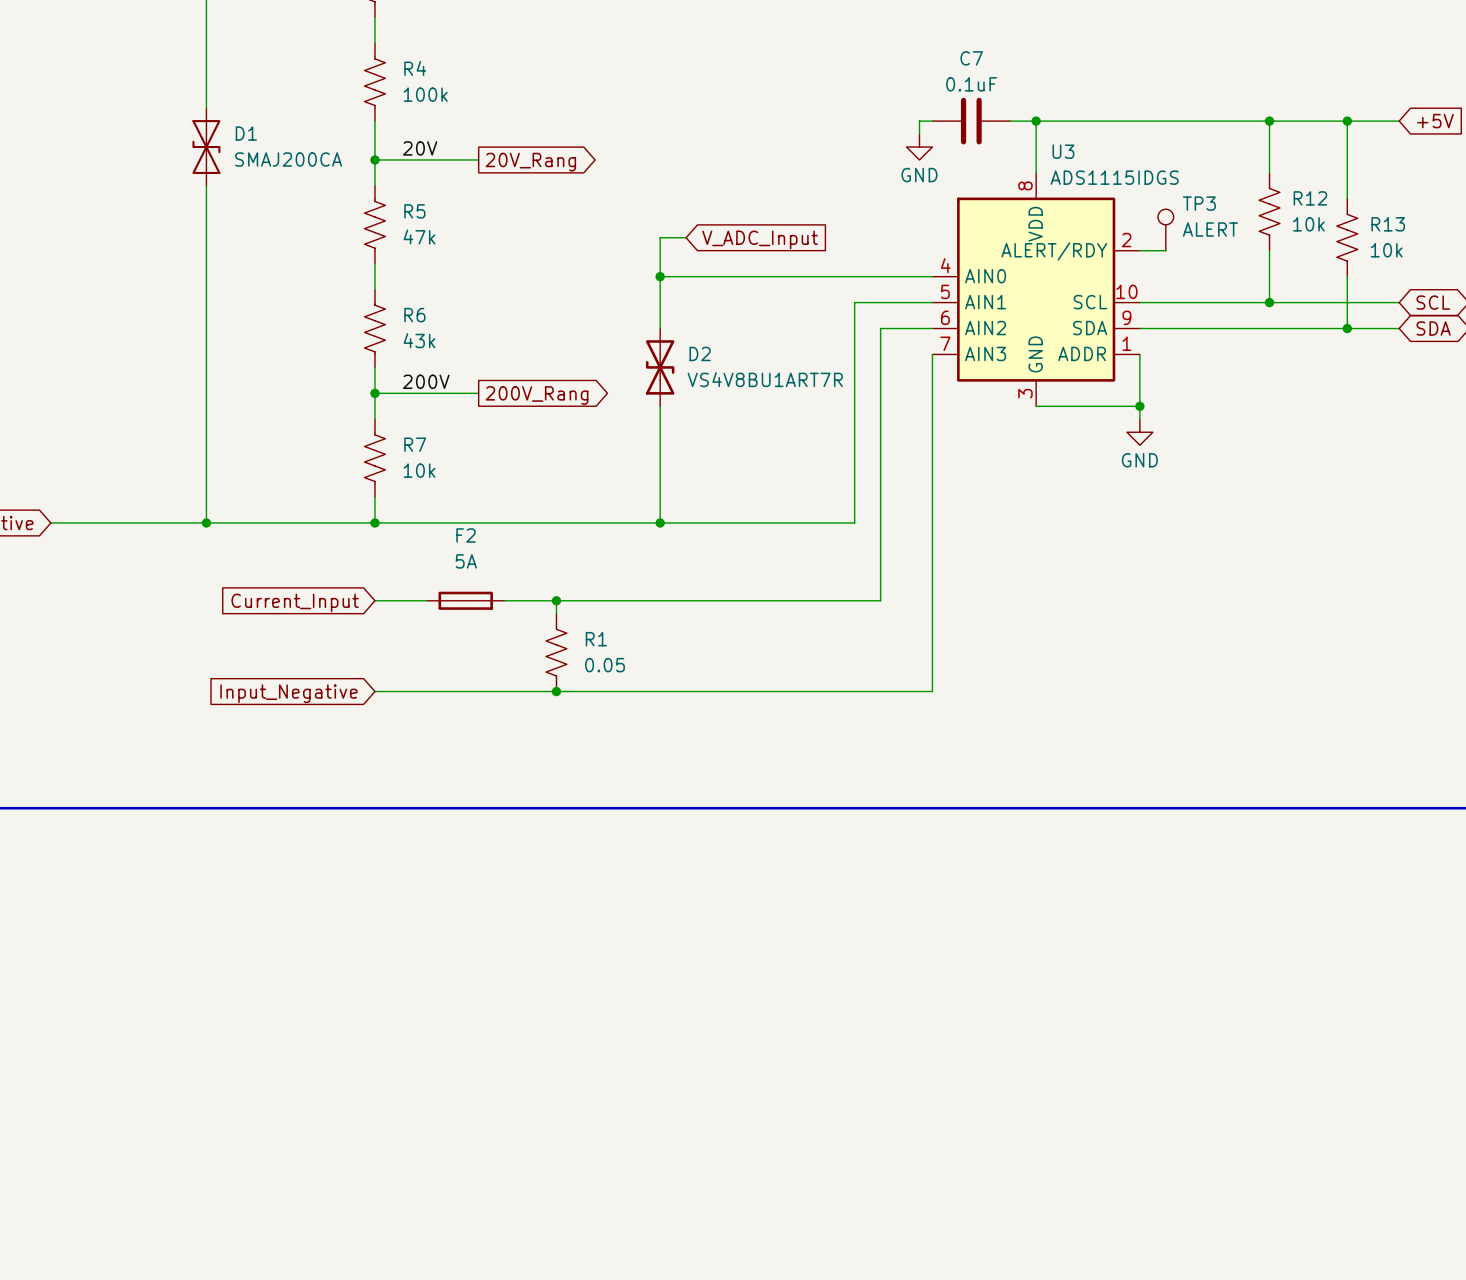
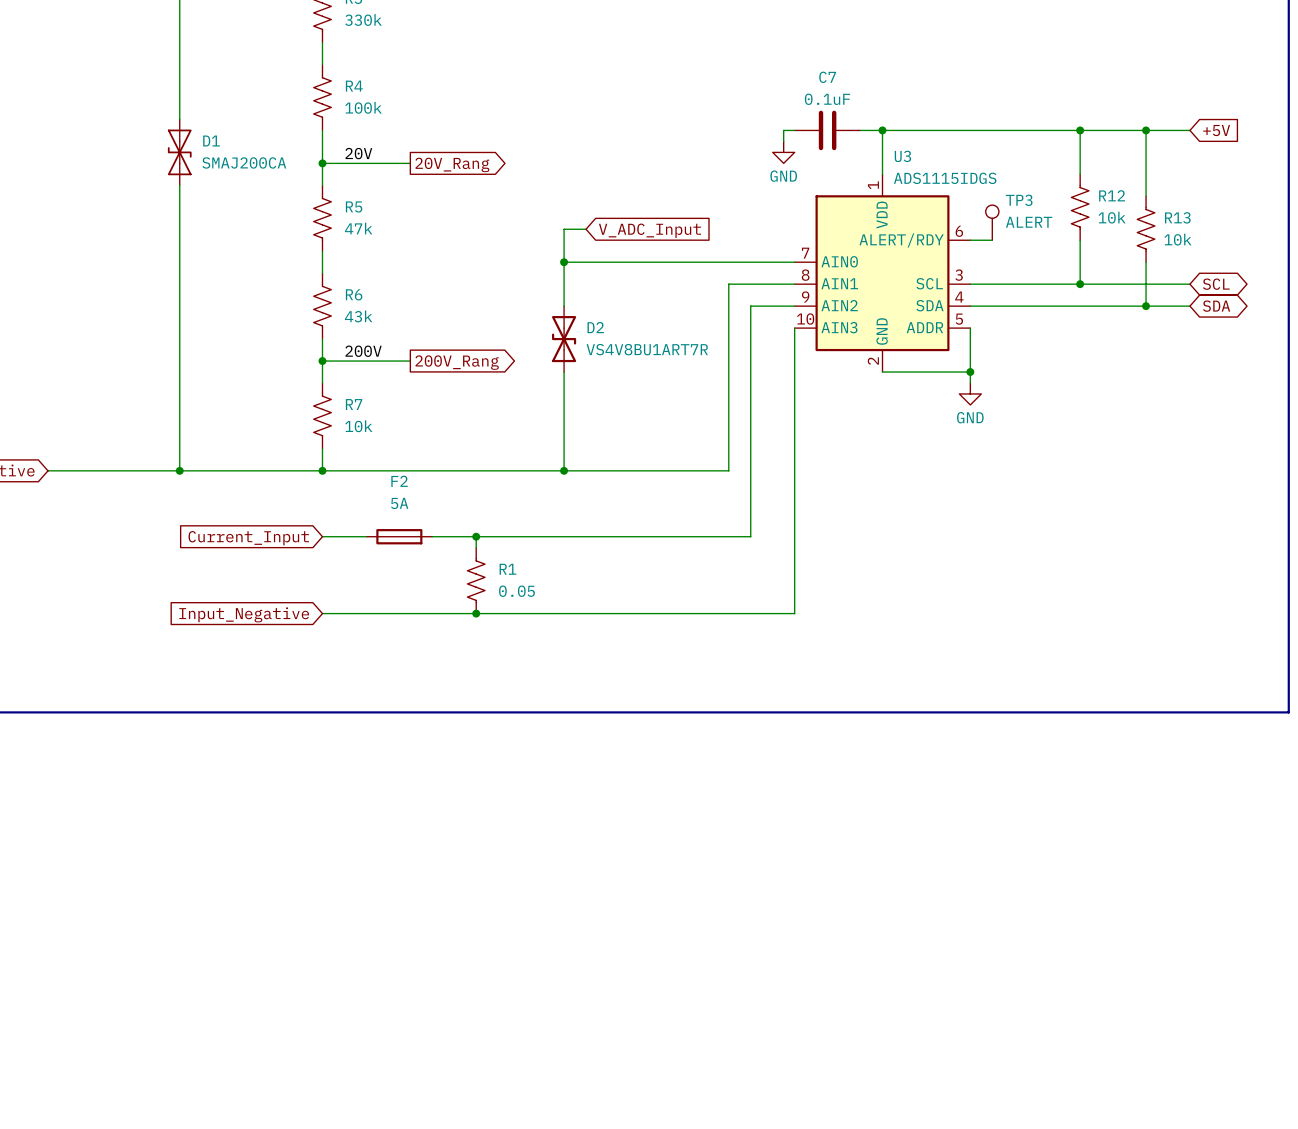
U3 symbol: [932, 172, 1140, 407] -> [794, 174, 971, 373]

